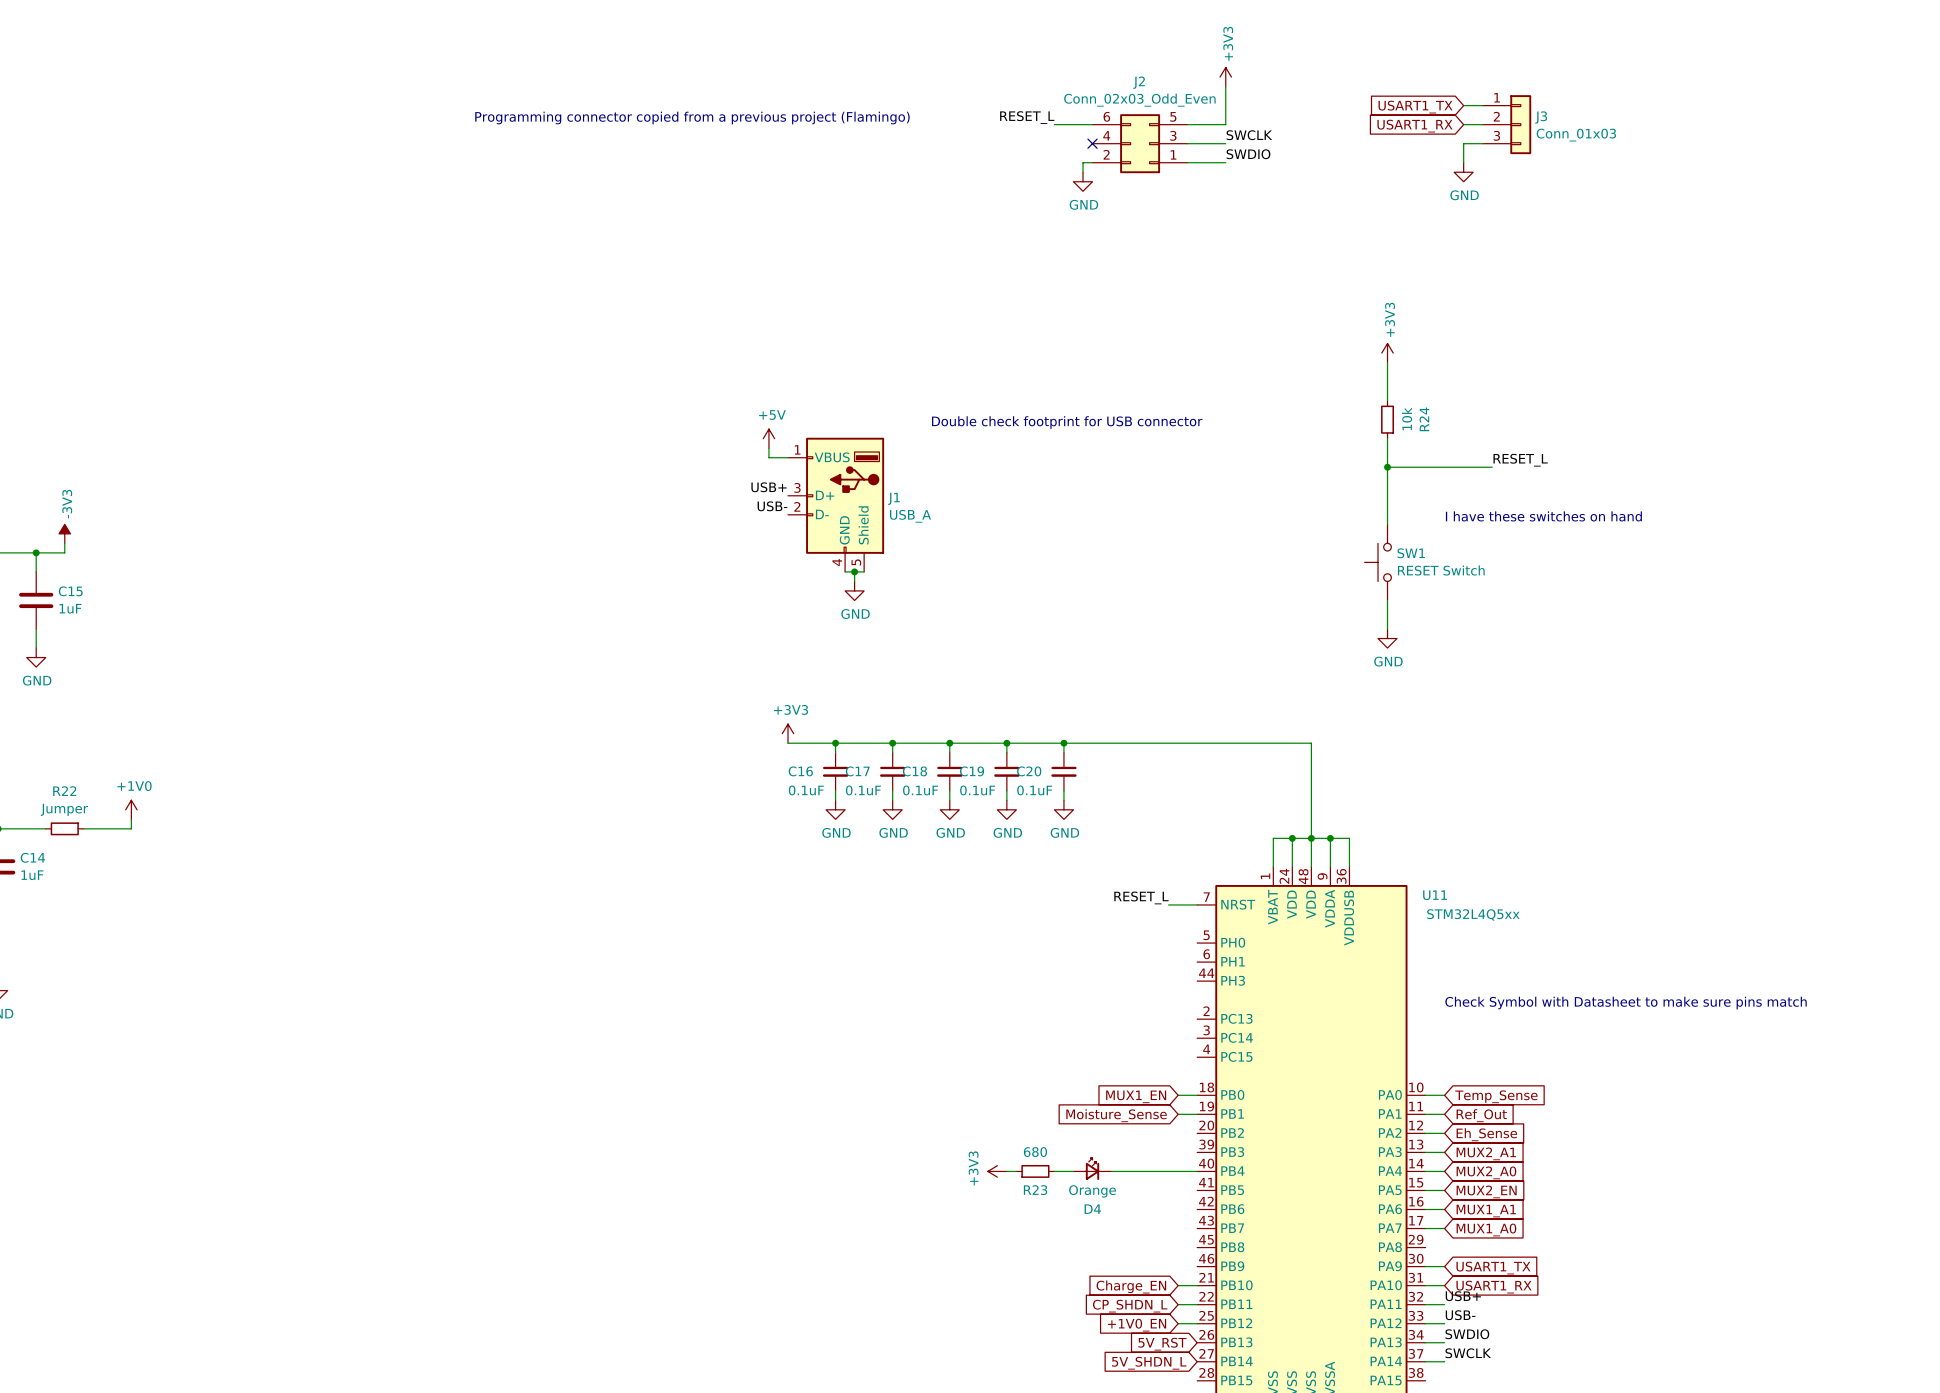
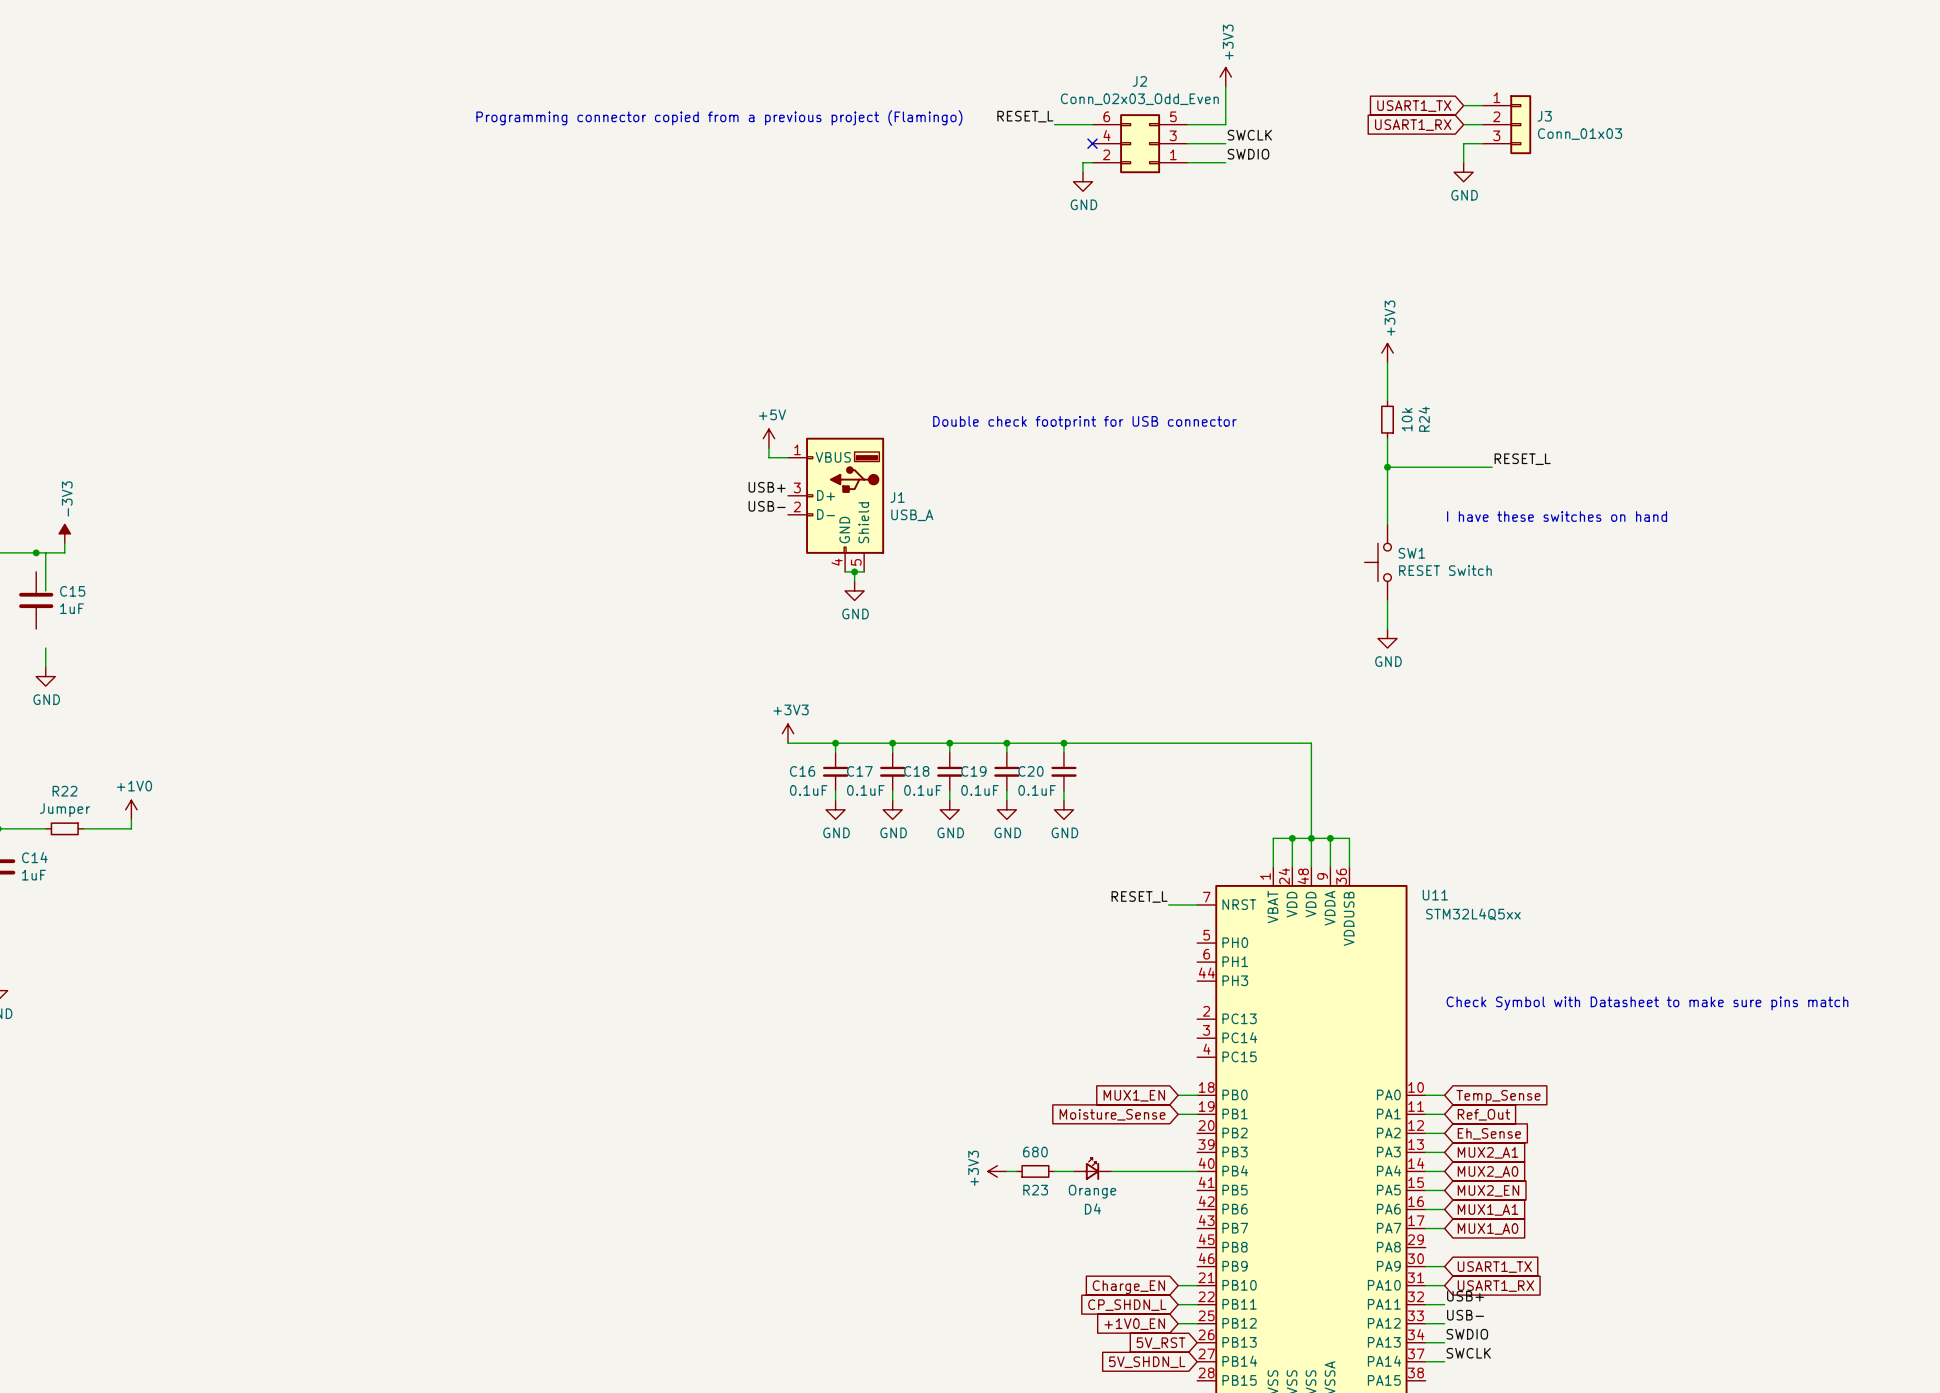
wire: (36, 552) (36, 571) -> none
wire: none -> (45, 552) (45, 590)
wire: (36, 629) (36, 648) -> (45, 648) (45, 667)
power symbol position: GND (36, 657) -> GND (45, 676)

